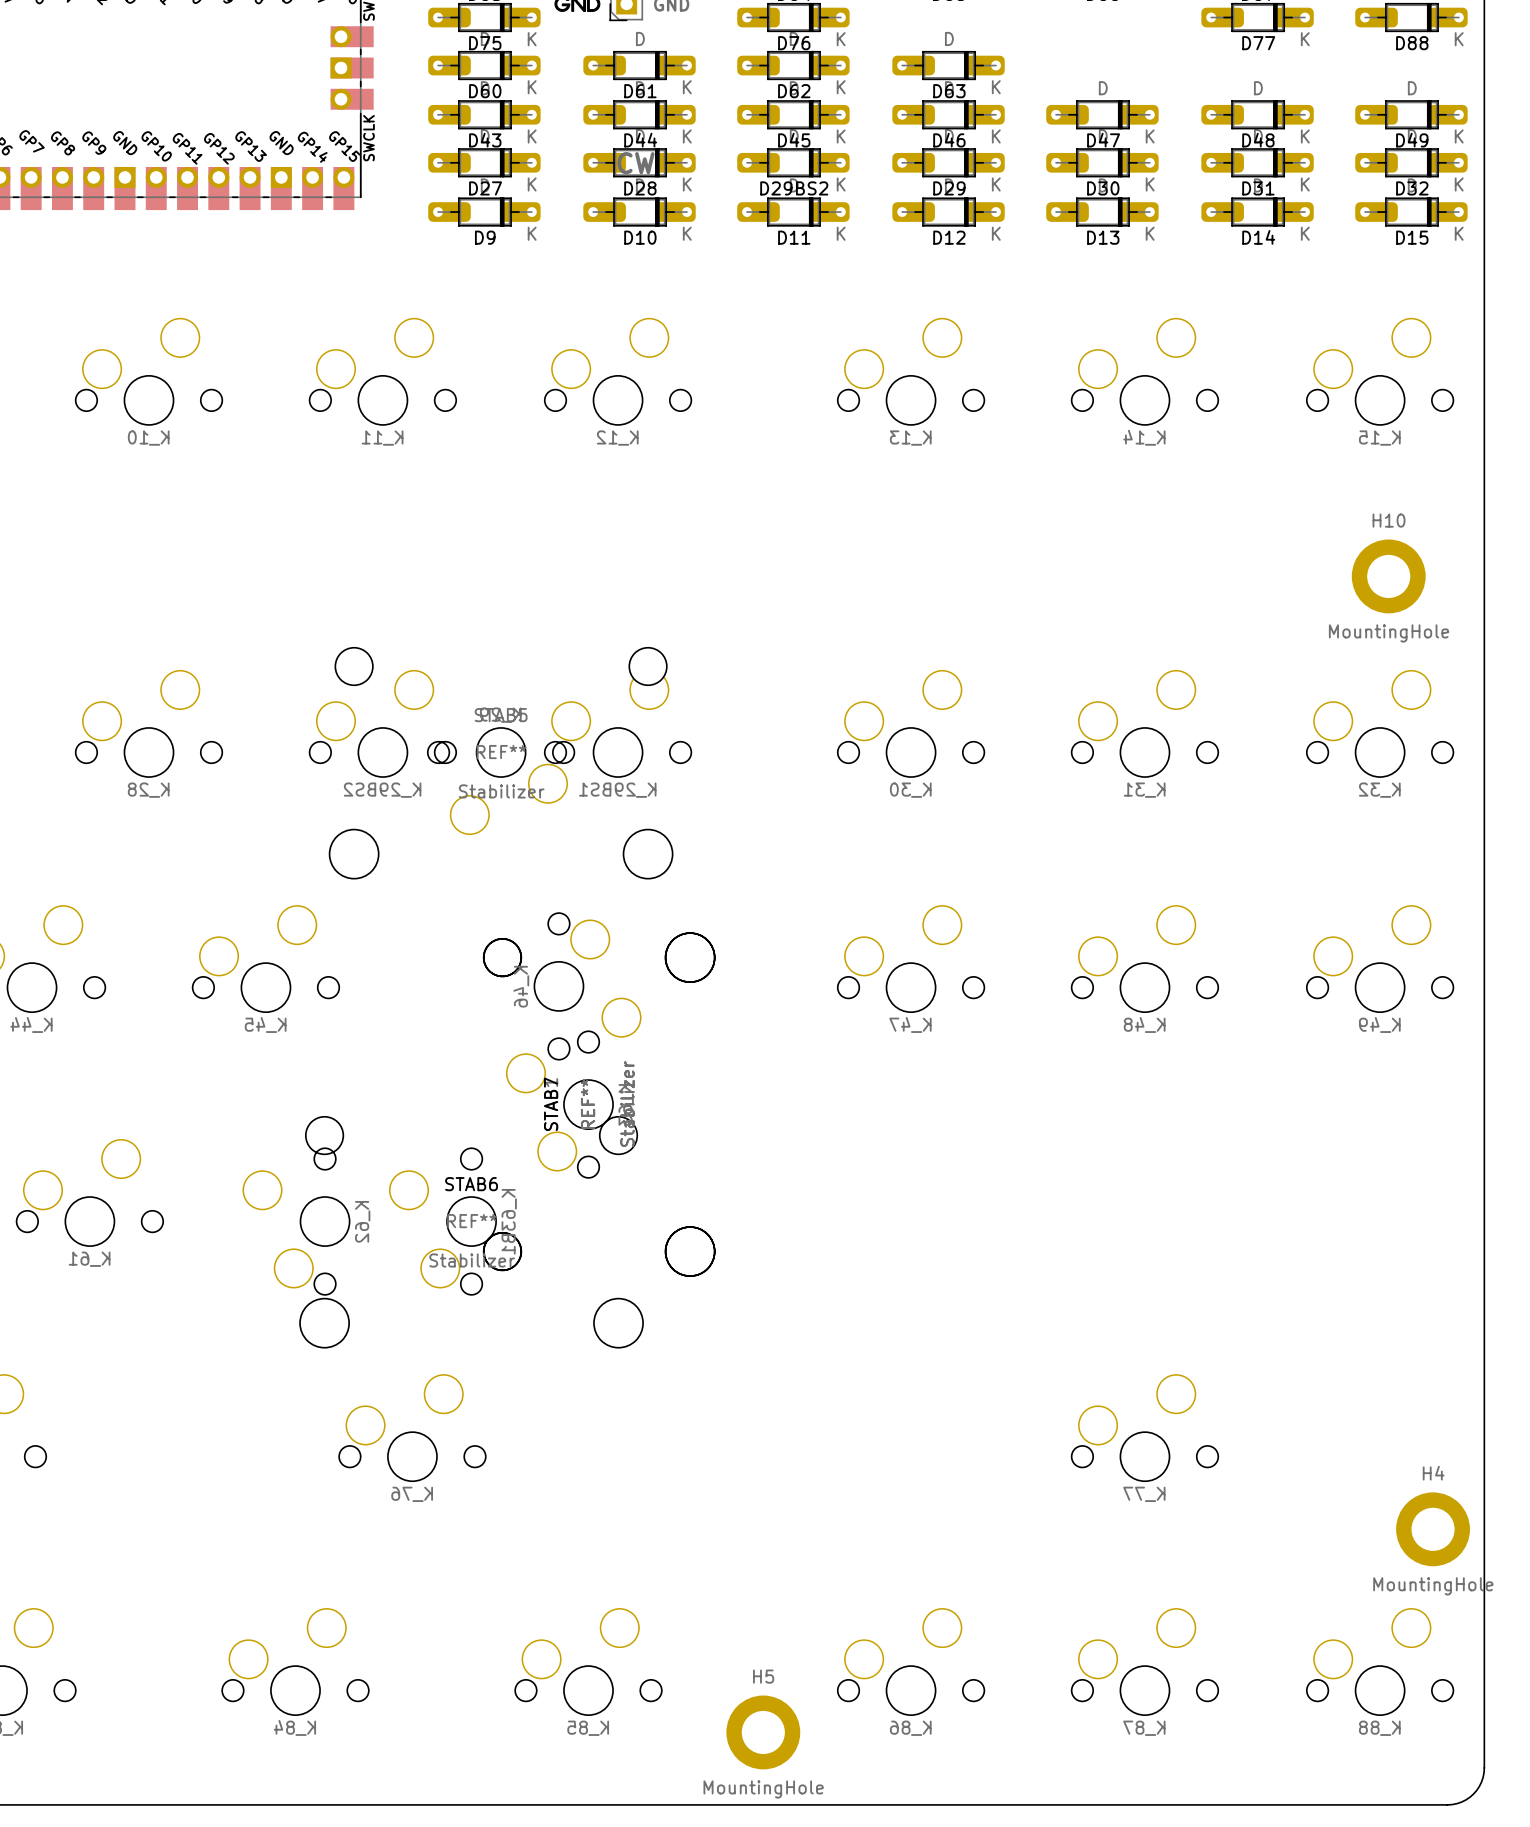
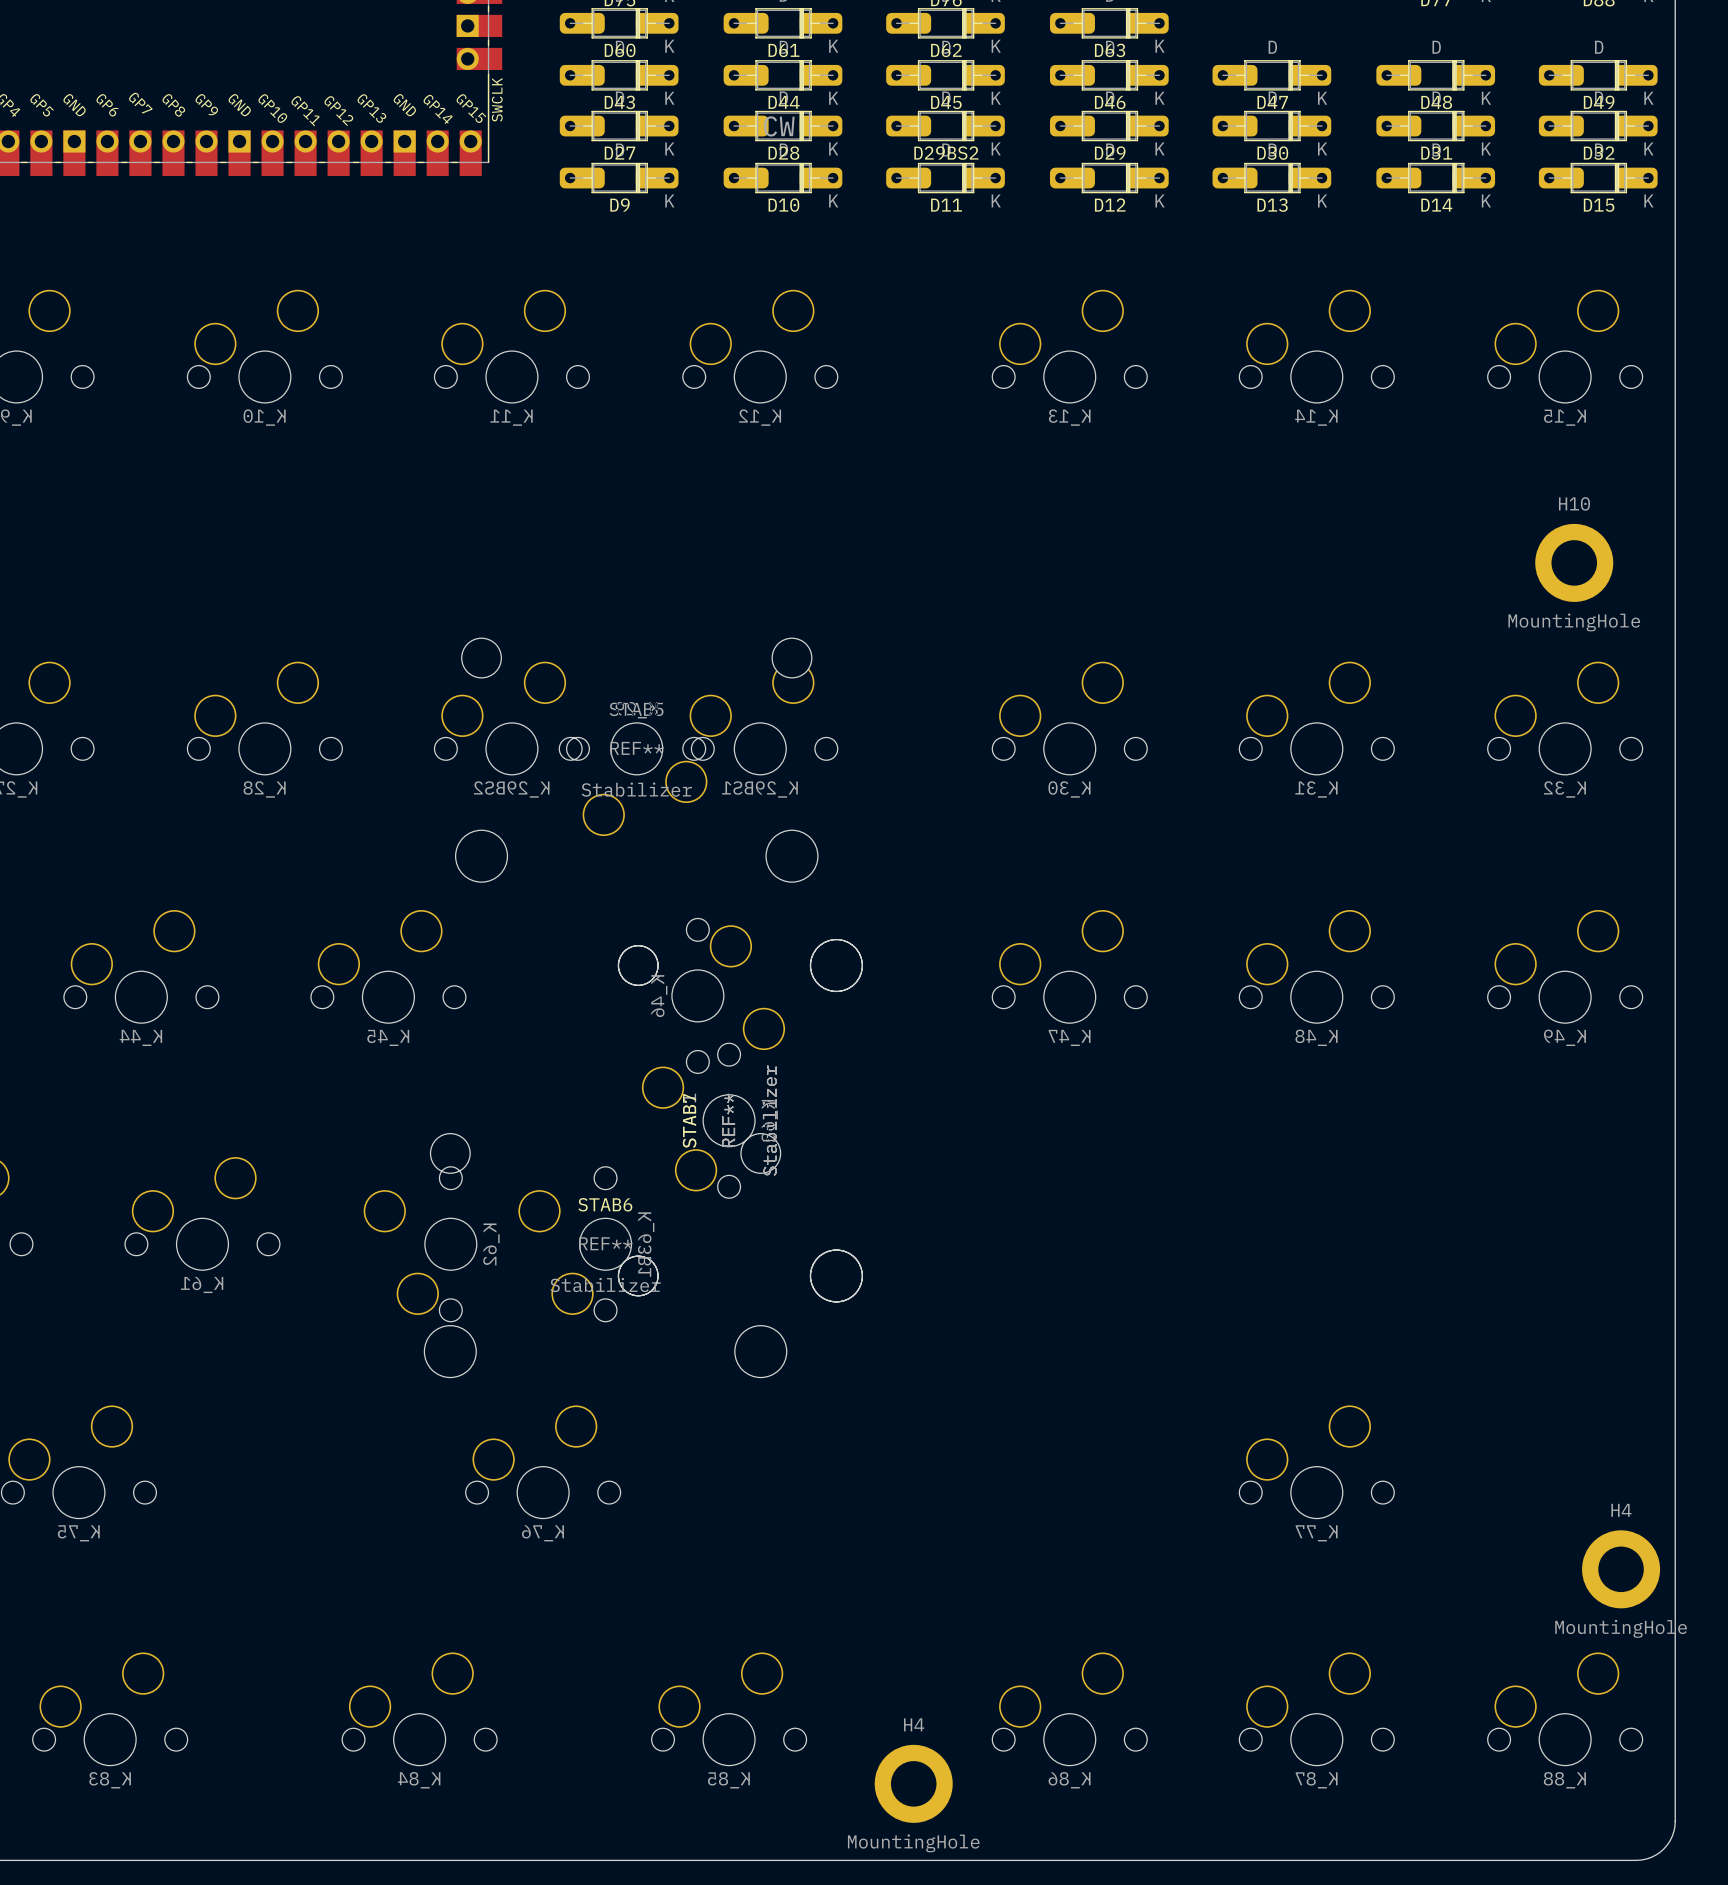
H5 name: H5 (763, 1676) -> H4 (914, 1724)

